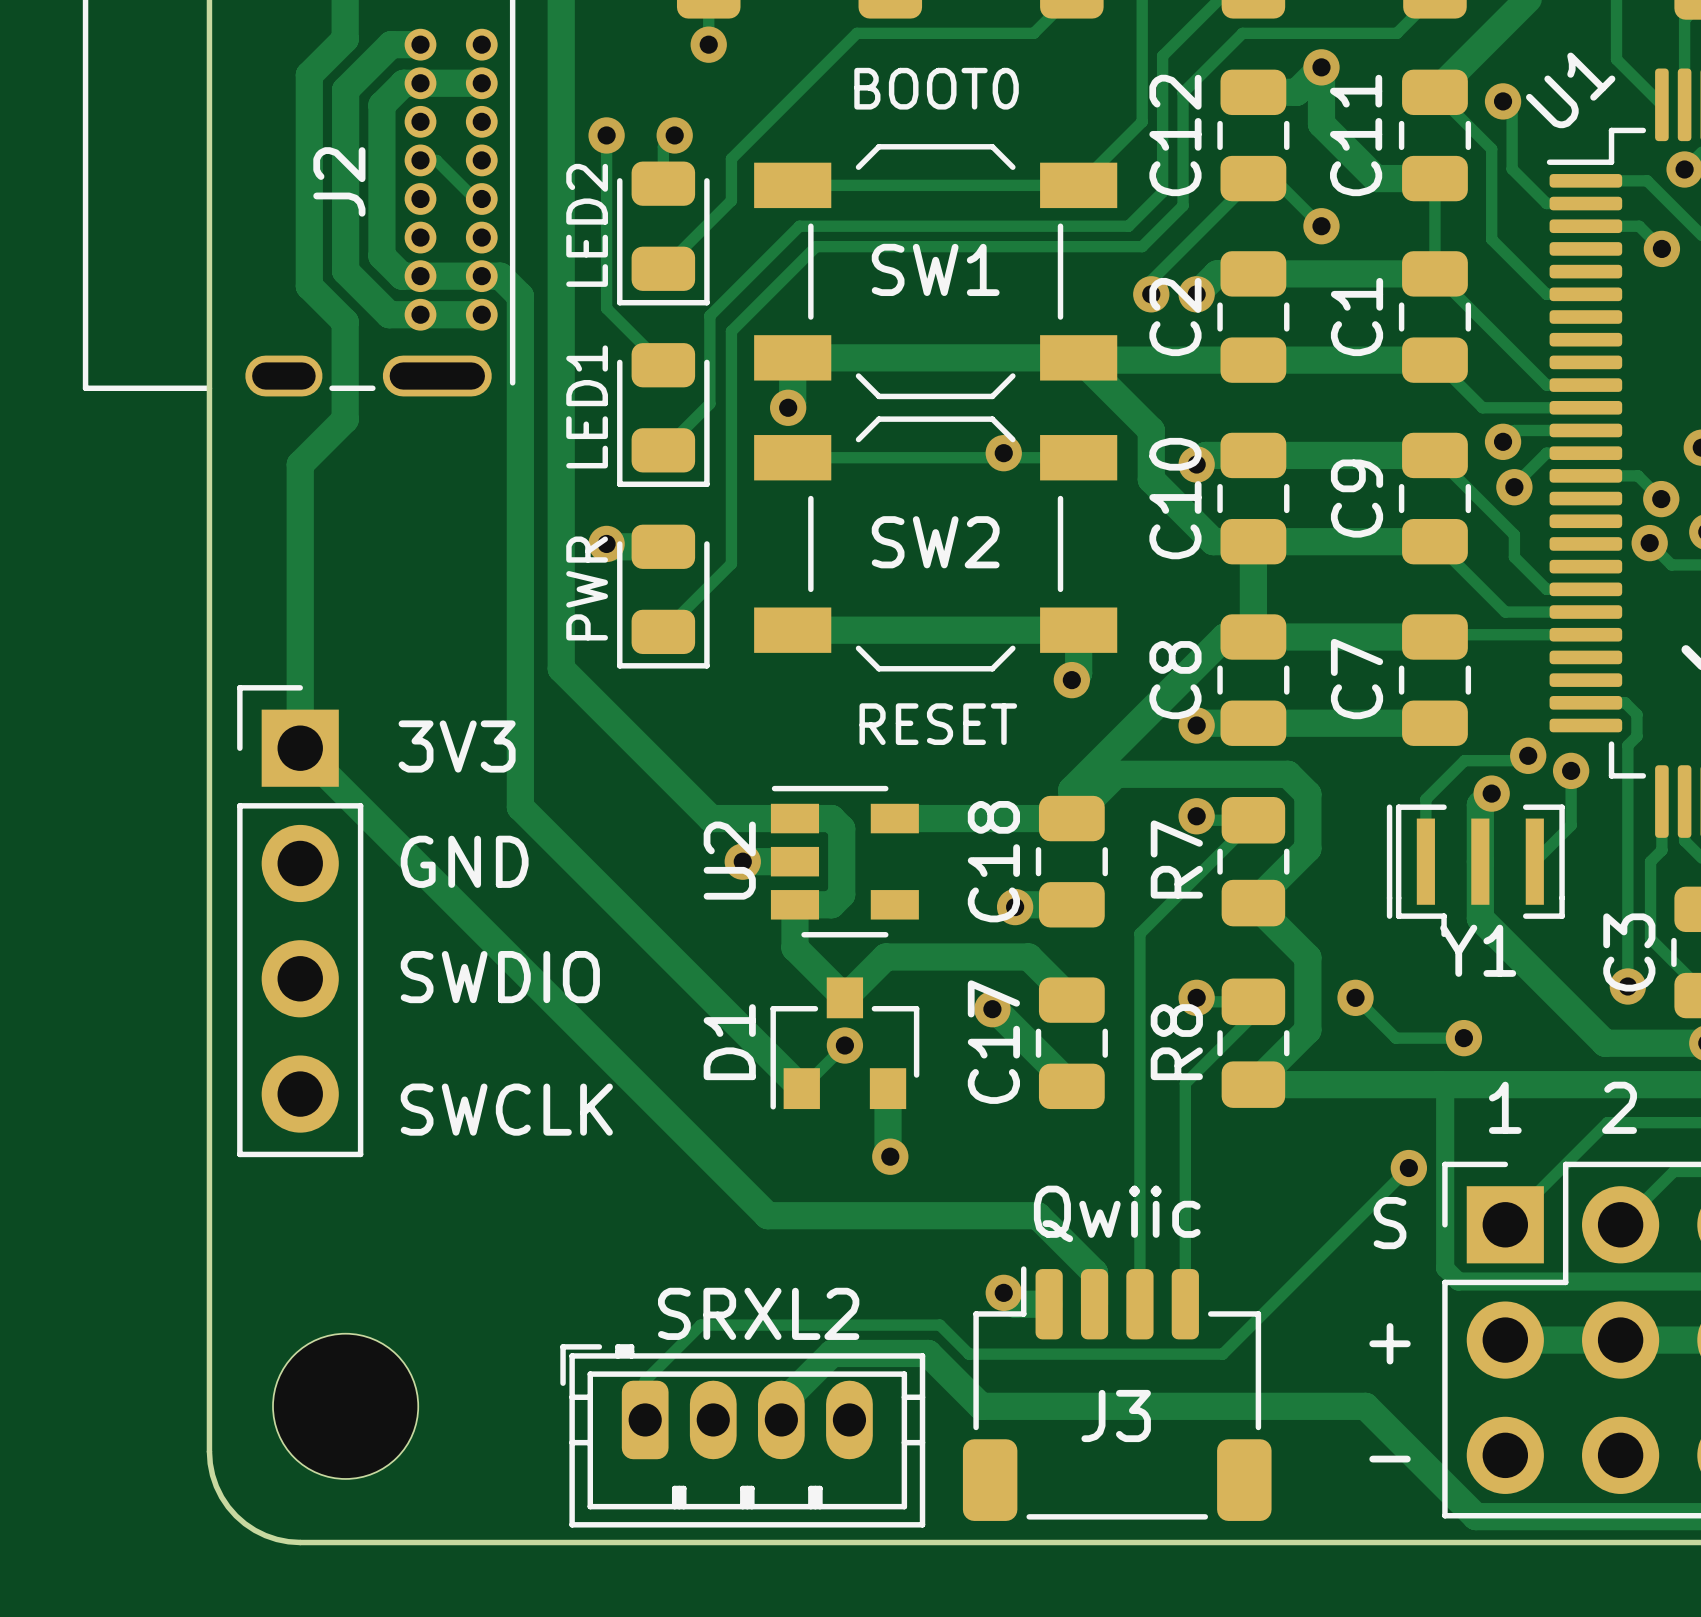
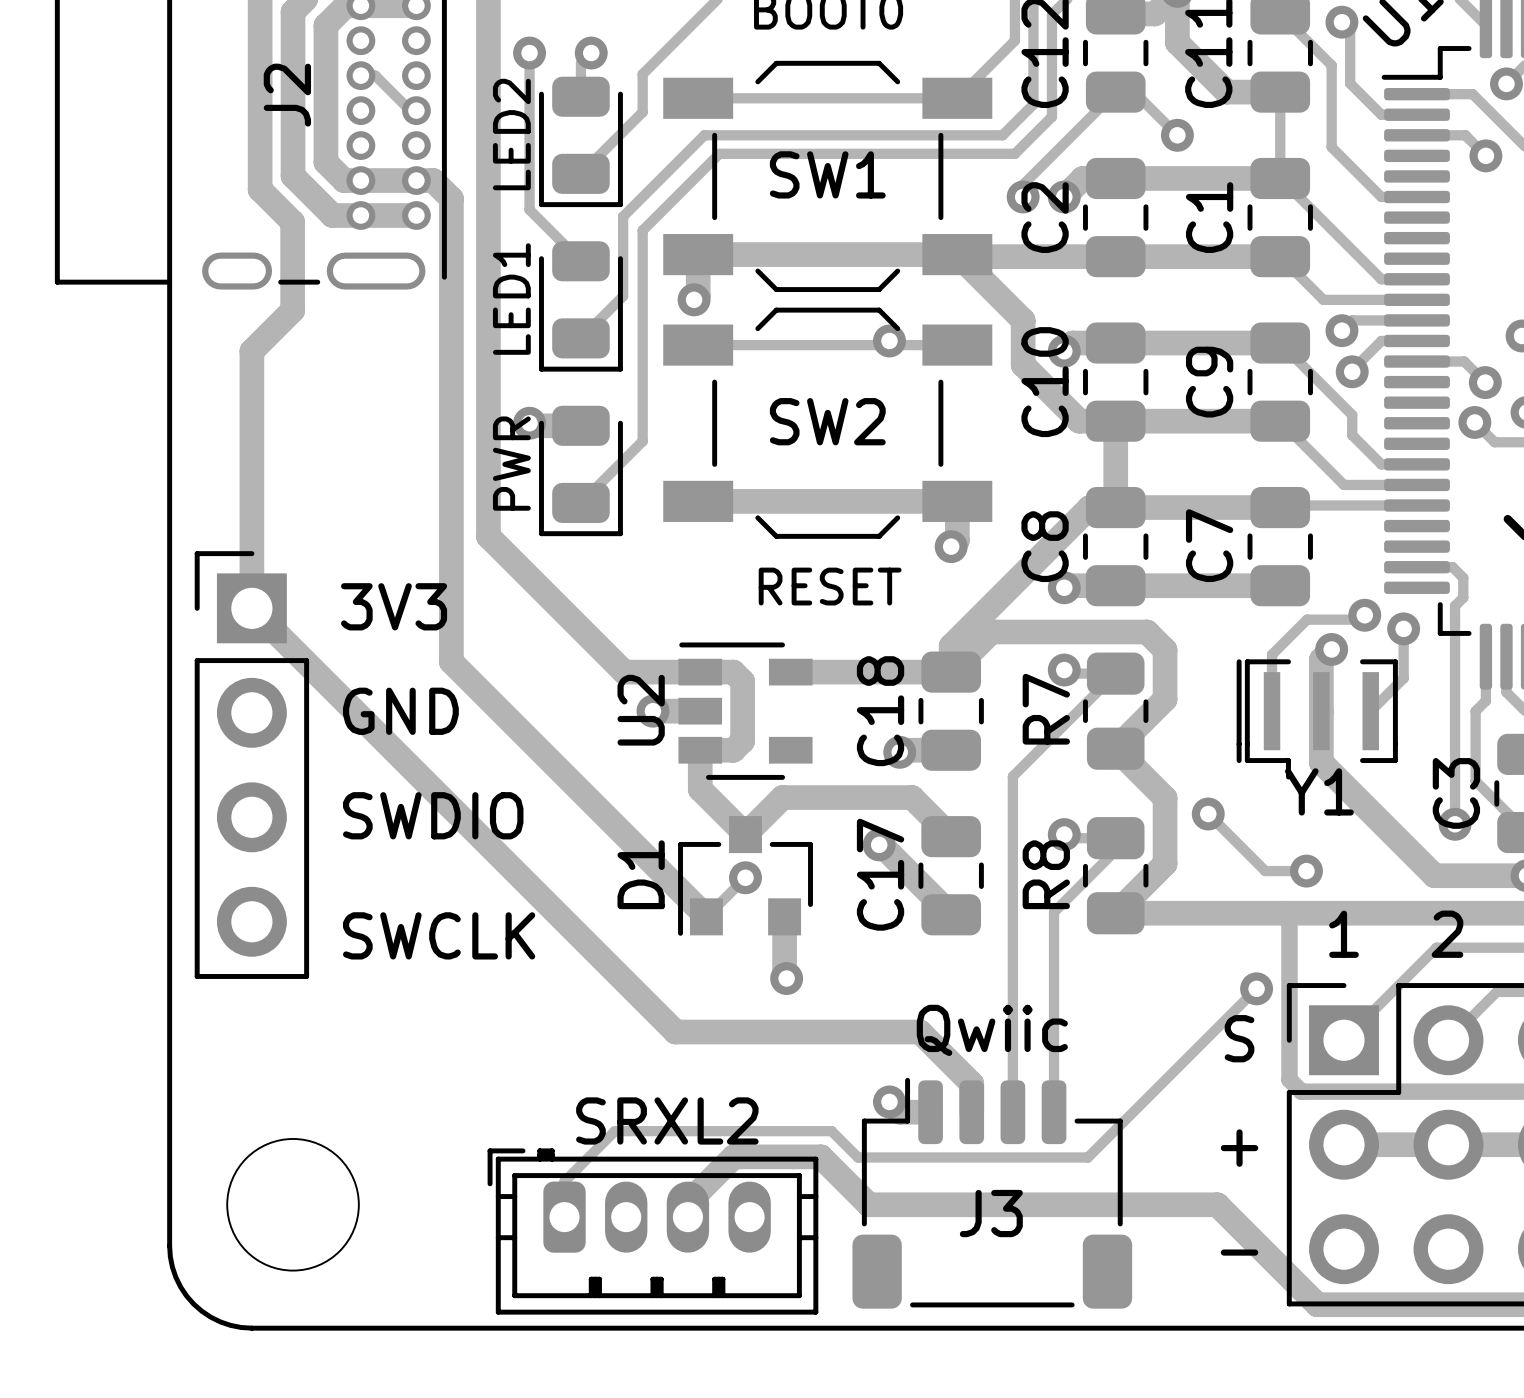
track: (1355, 997) (1395, 1038) (1418, 1038) -> (1208, 814) (1265, 871)
via position: (1355, 997) -> (1208, 814)

